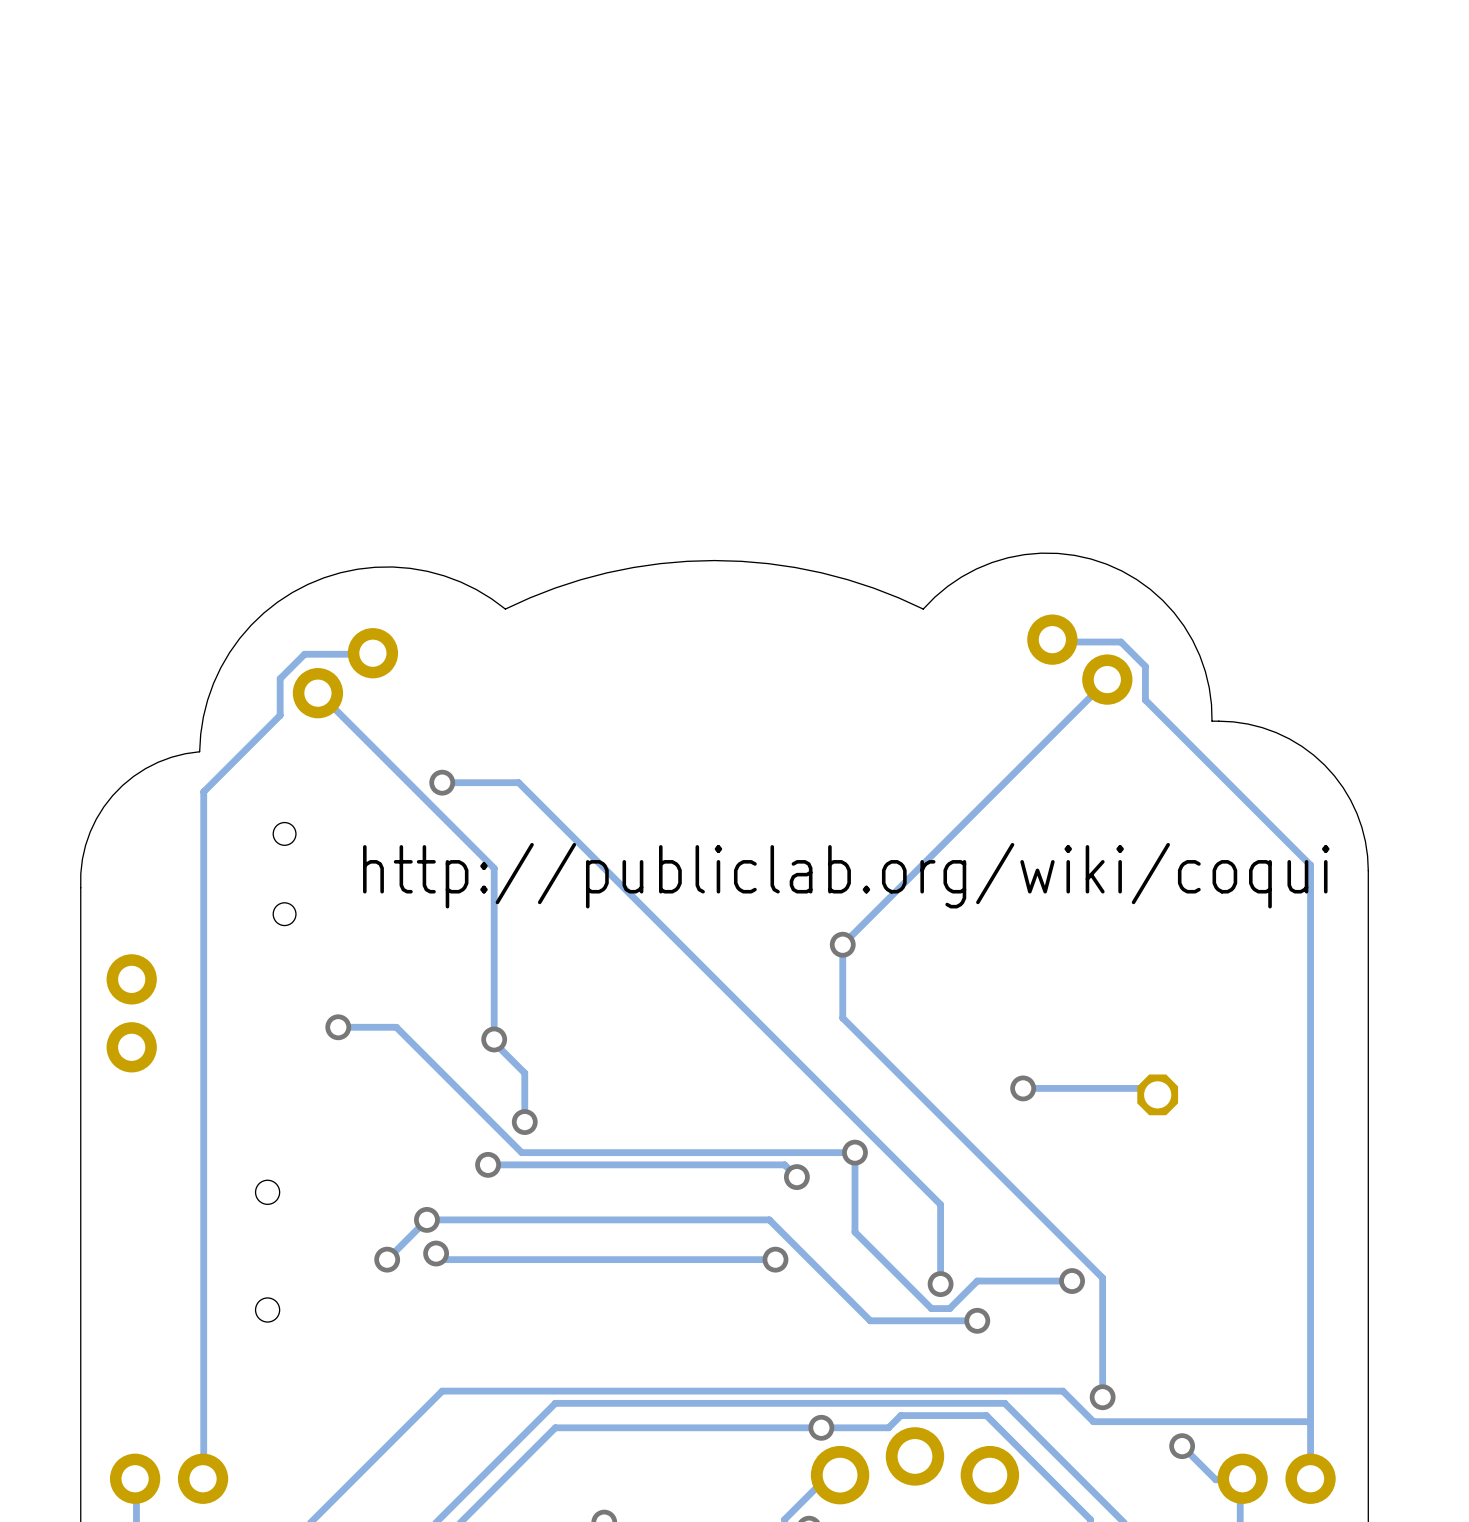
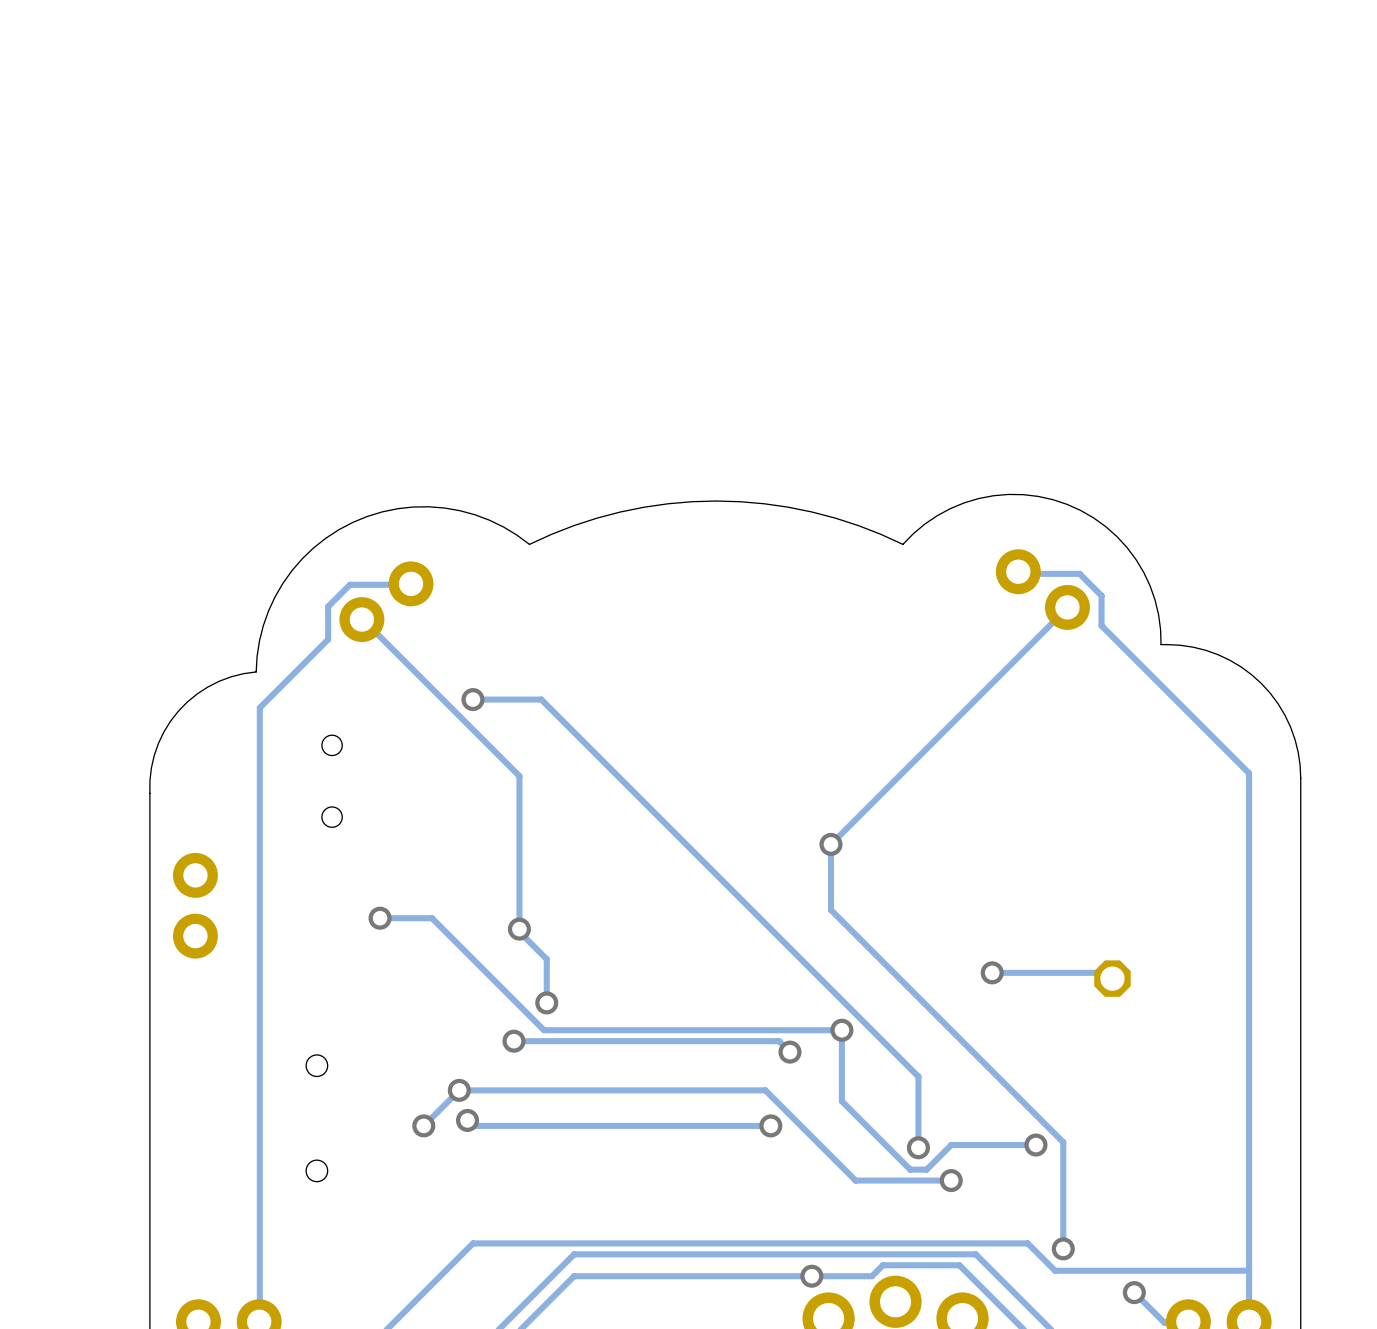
text: http://publiclab.org/wiki/coqui (846, 875) -> none

